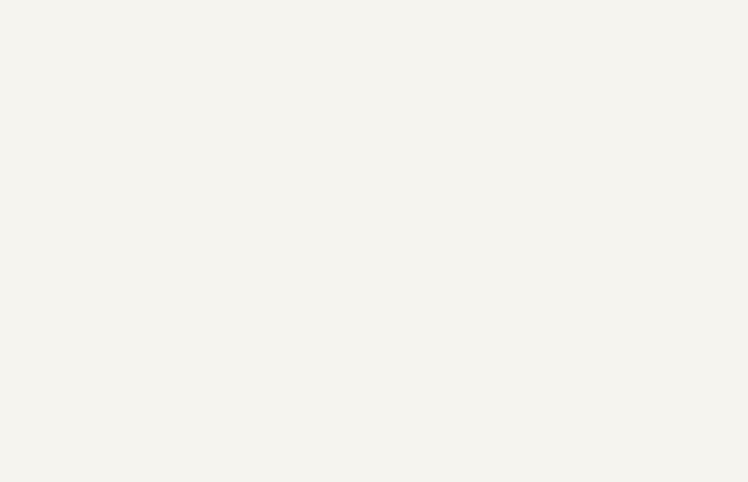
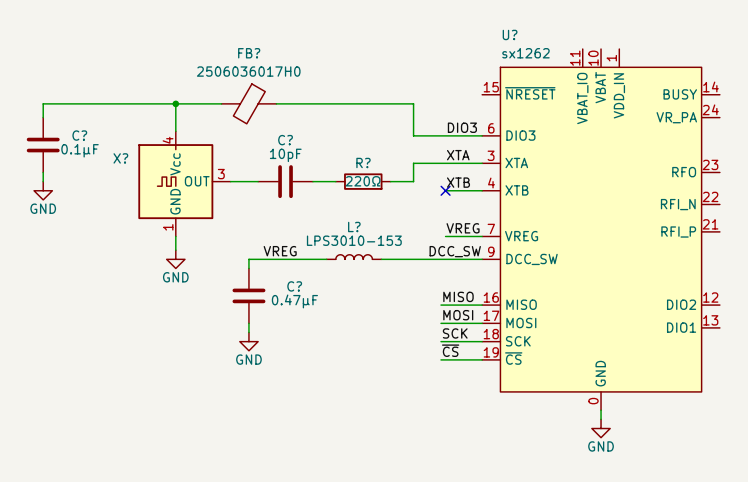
wire: none -> (175, 103) (175, 131)
junction: none -> (175, 103)
wire: none -> (221, 103) (43, 103) (43, 117)
FB?: none -> 2506036017H0 (248, 103)
wire: none -> (276, 103) (413, 103) (413, 135) (482, 135)
label: none -> DIO3 (462, 127)
C?: none -> 0.1μF (43, 145)
label: none -> XTA (458, 155)
wire: none -> (482, 163) (413, 163) (413, 181) (390, 181)
wire: none -> (43, 172) (43, 181)
wire: none -> (230, 181) (258, 181)
C?: none -> 10pF (285, 181)
wire: none -> (312, 181) (335, 181)
R?: none -> 220Ω (363, 181)
label: none -> XTB (458, 182)
X?: none -> (184, 183)
power symbol: none -> GND (43, 190)
wire: none -> (445, 190) (482, 190)
no-connect mark: none -> (445, 190)
label: none -> VREG (463, 228)
U?: none -> sx1262 (601, 229)
wire: none -> (175, 236) (175, 250)
wire: none -> (445, 236) (482, 236)
label: none -> VREG (280, 251)
label: none -> DCC_SW (455, 251)
L?: none -> LPS3010-153 (354, 257)
power symbol: none -> GND (175, 259)
wire: none -> (326, 259) (248, 259) (248, 268)
wire: none -> (381, 259) (482, 259)
C?: none -> 0.47μF (248, 295)
label: none -> MISO (458, 296)
wire: none -> (440, 305) (482, 305)
label: none -> MOSI (458, 315)
wire: none -> (248, 323) (248, 332)
wire: none -> (440, 323) (482, 323)
label: none -> SCK (455, 333)
power symbol: none -> GND (248, 341)
wire: none -> (440, 341) (482, 341)
label: none -> ~{CS} (450, 350)
wire: none -> (440, 359) (482, 359)
wire: none -> (601, 410) (601, 419)
power symbol: none -> GND (601, 428)

